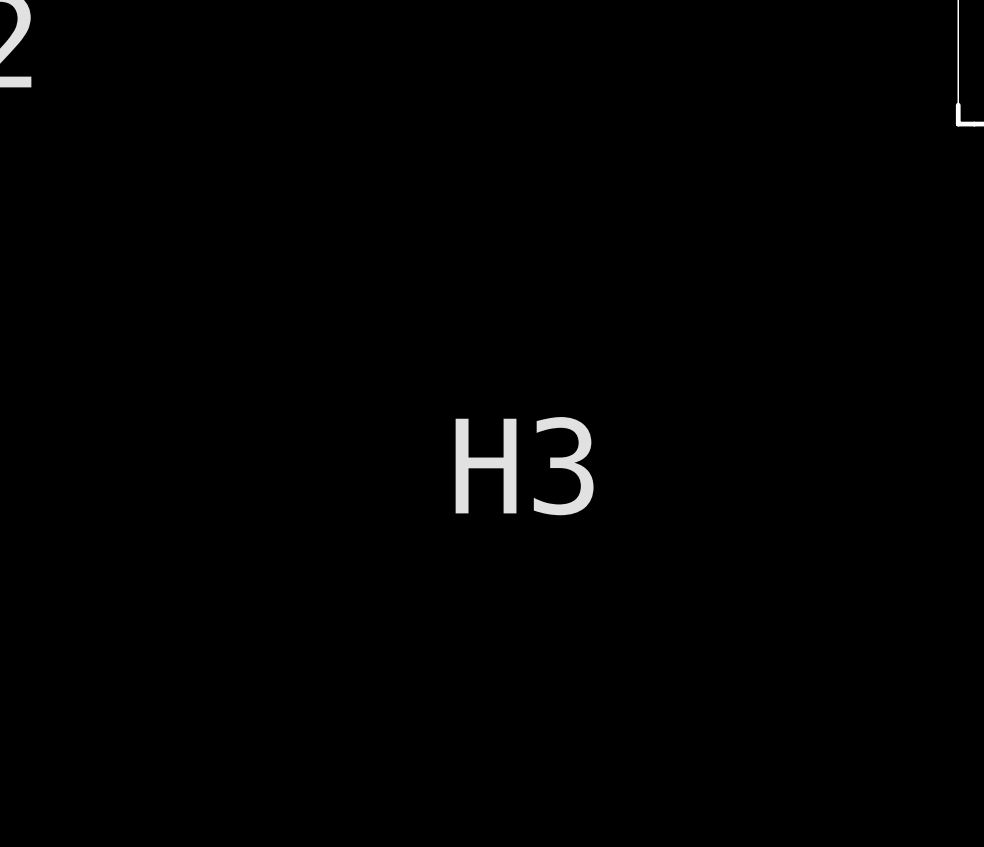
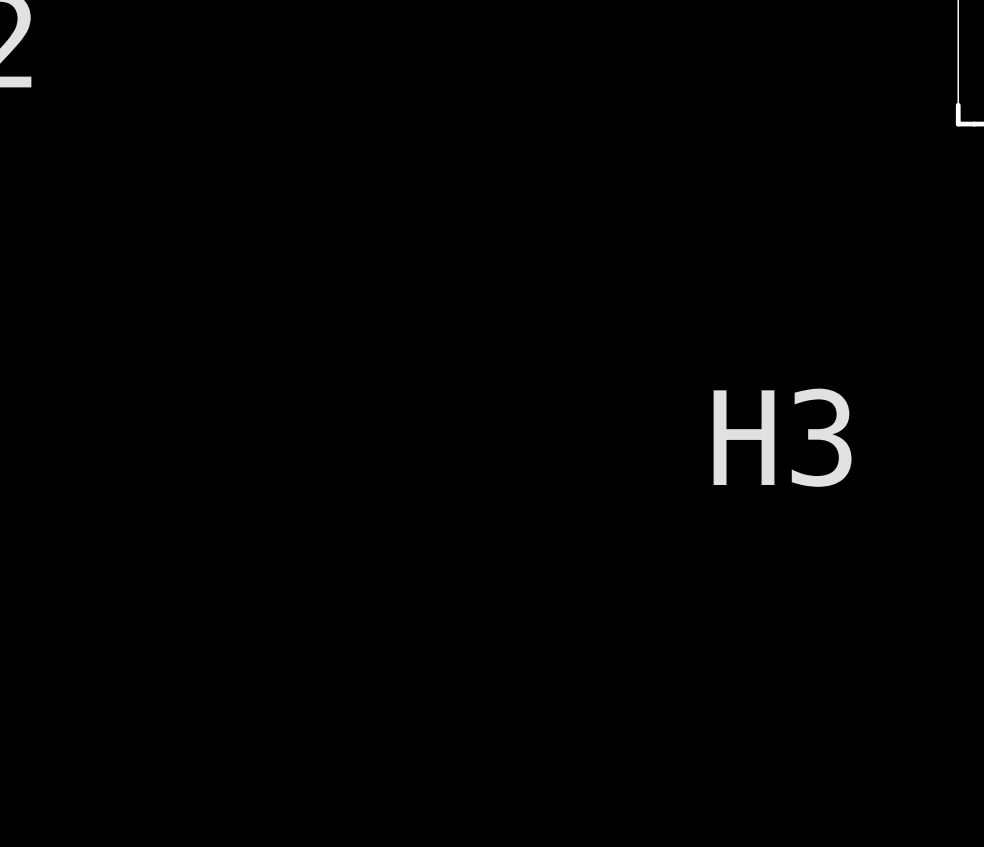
H3 name position: H3 (524, 466) -> H3 (782, 437)

